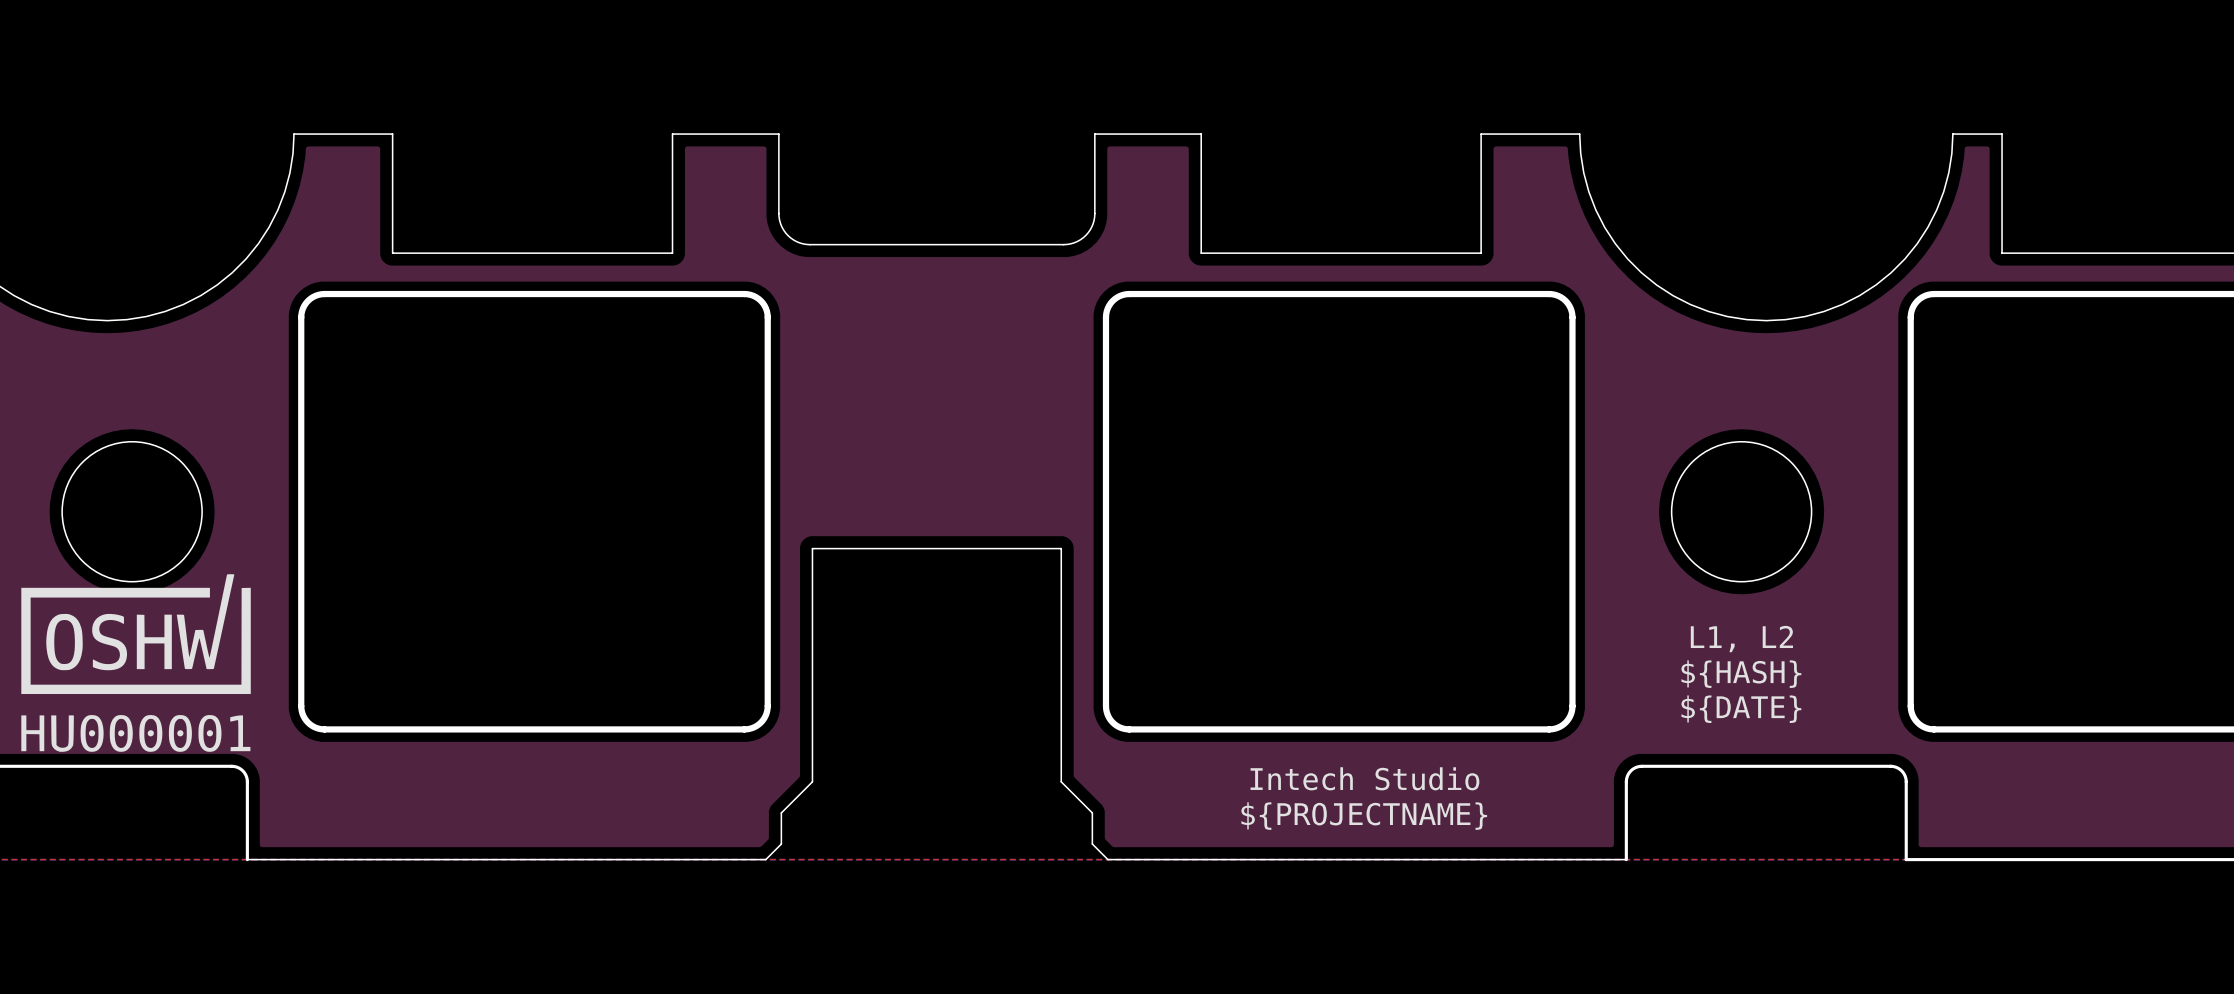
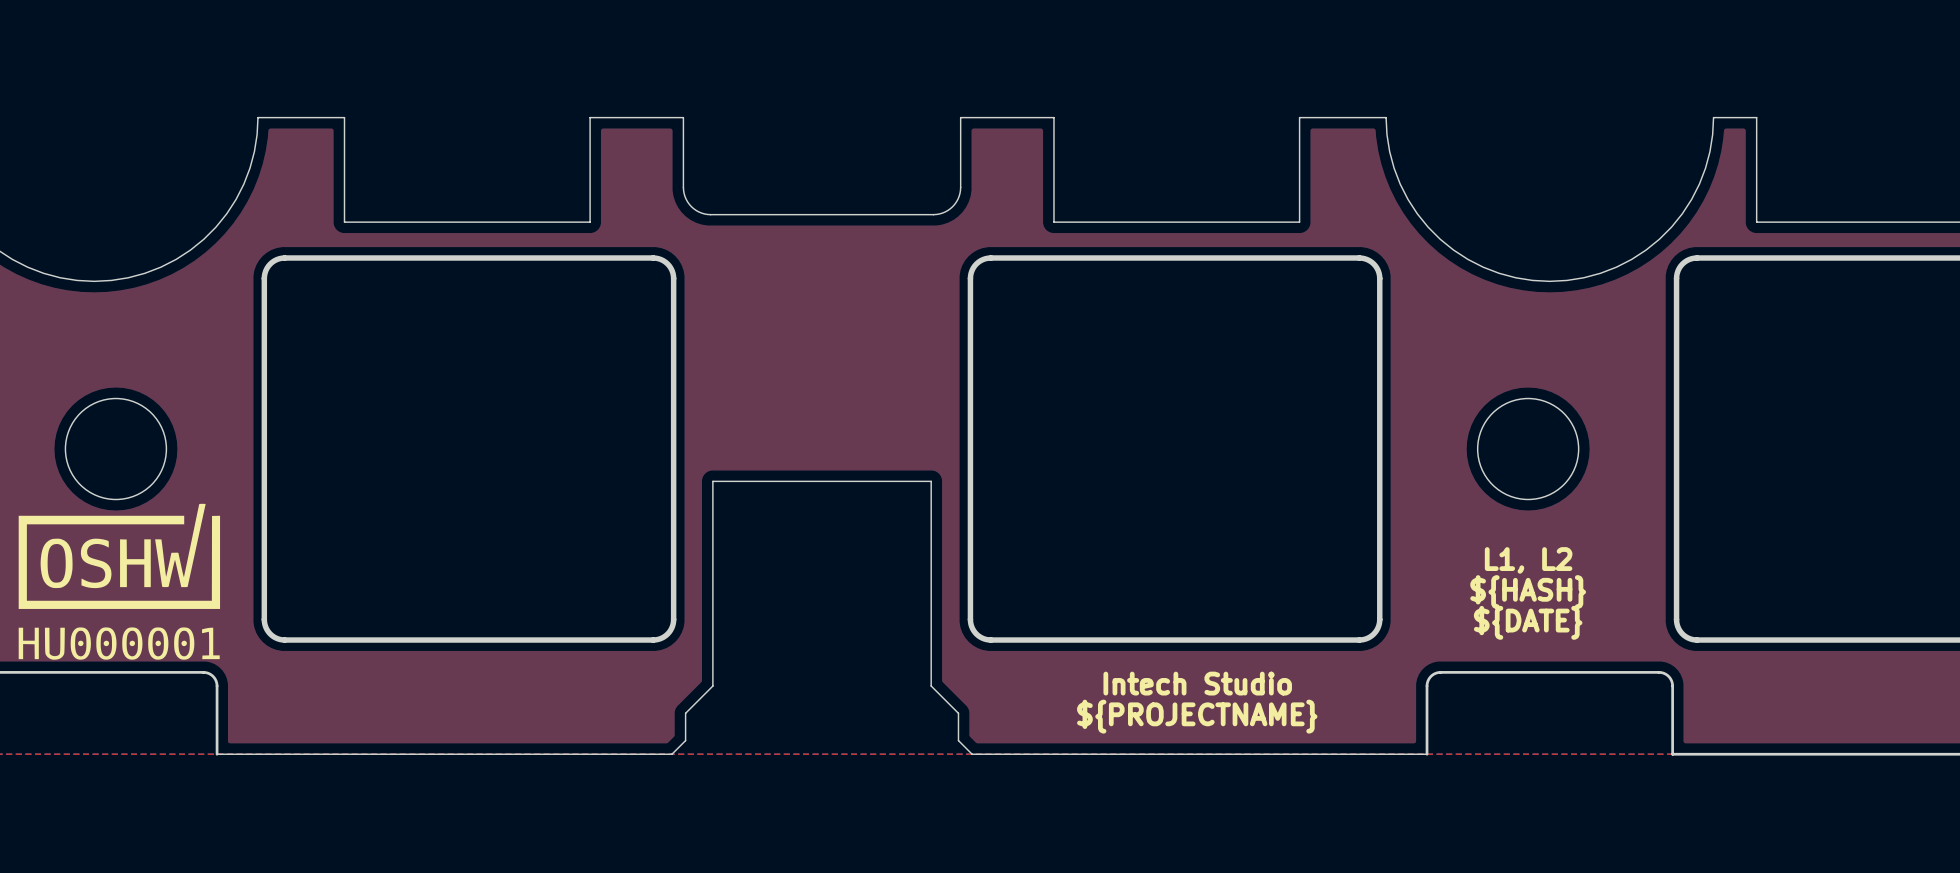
round board edge size: [61, 440, 203, 583] -> [64, 397, 168, 501]
round board edge size: [1670, 440, 1813, 583] -> [1476, 397, 1580, 501]

